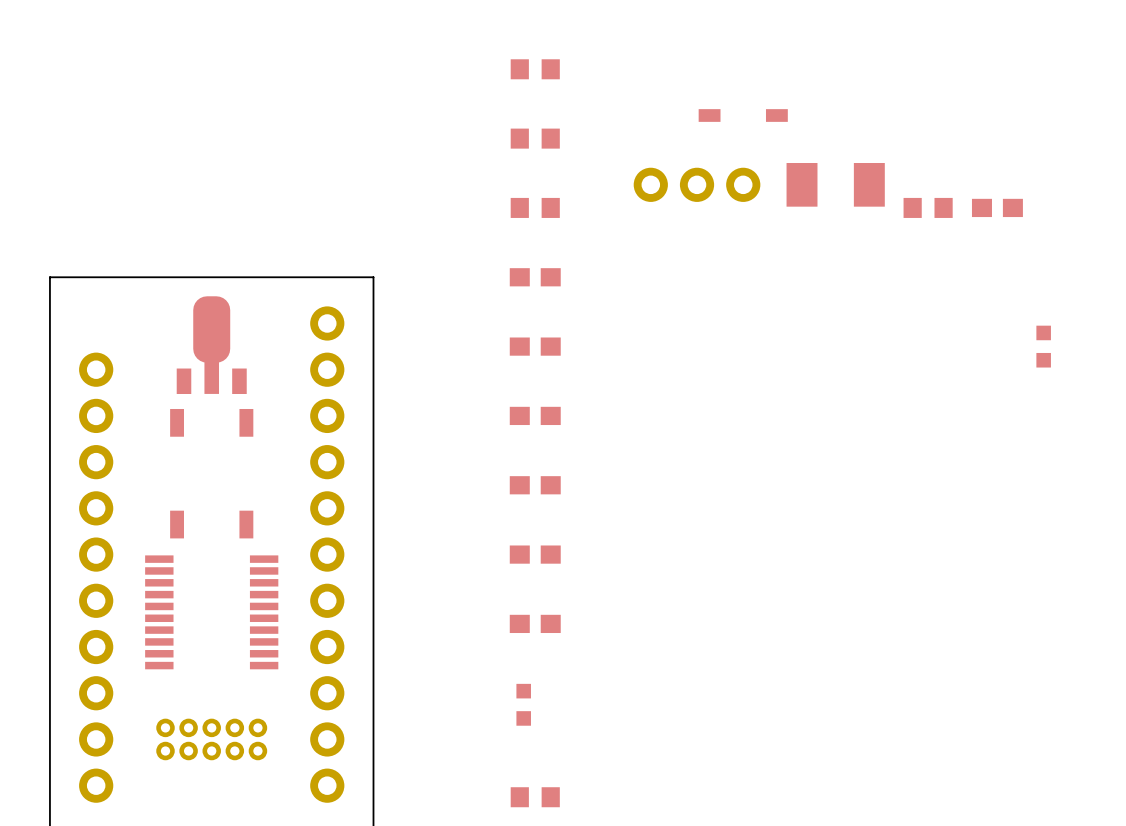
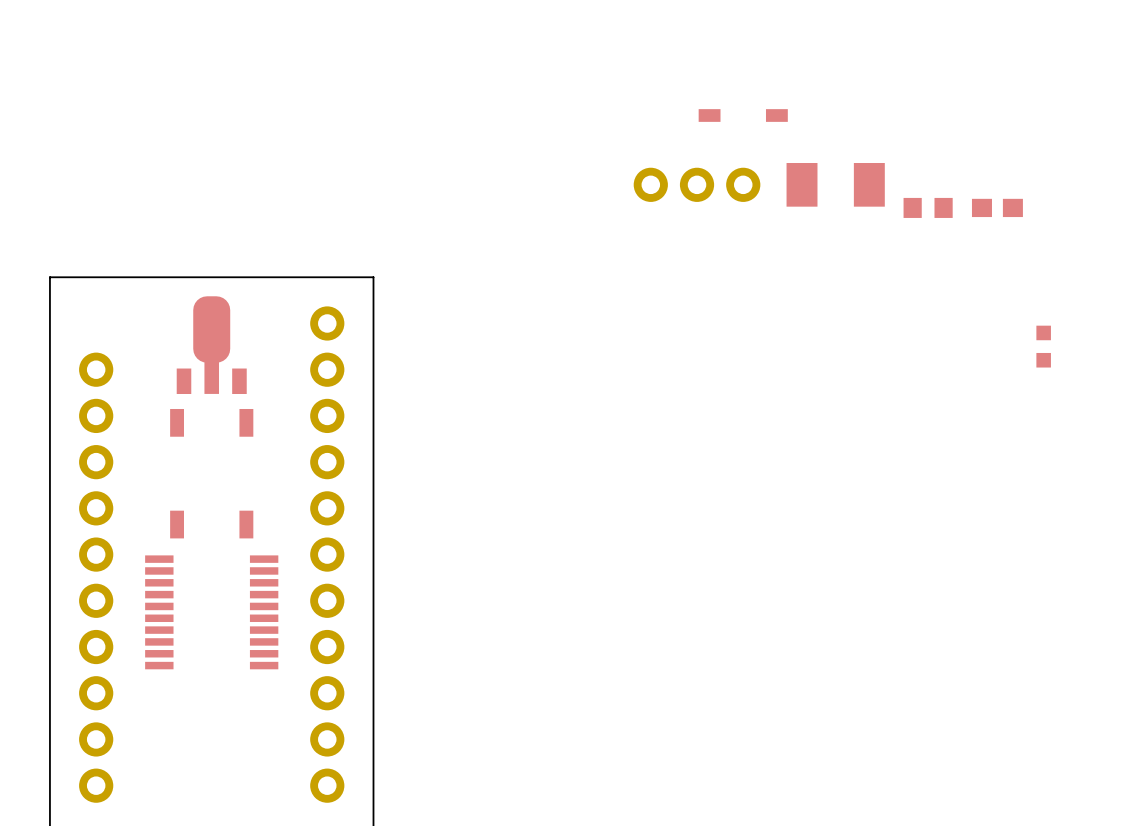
part: (535, 69) -> none
part: (535, 138) -> none
part: (535, 207) -> none
part: (535, 277) -> none
part: (535, 346) -> none
part: (535, 415) -> none
part: (535, 485) -> none
part: (535, 554) -> none
part: (535, 623) -> none
part: (523, 704) -> none
part: (211, 739) -> none
part: (535, 797) -> none

